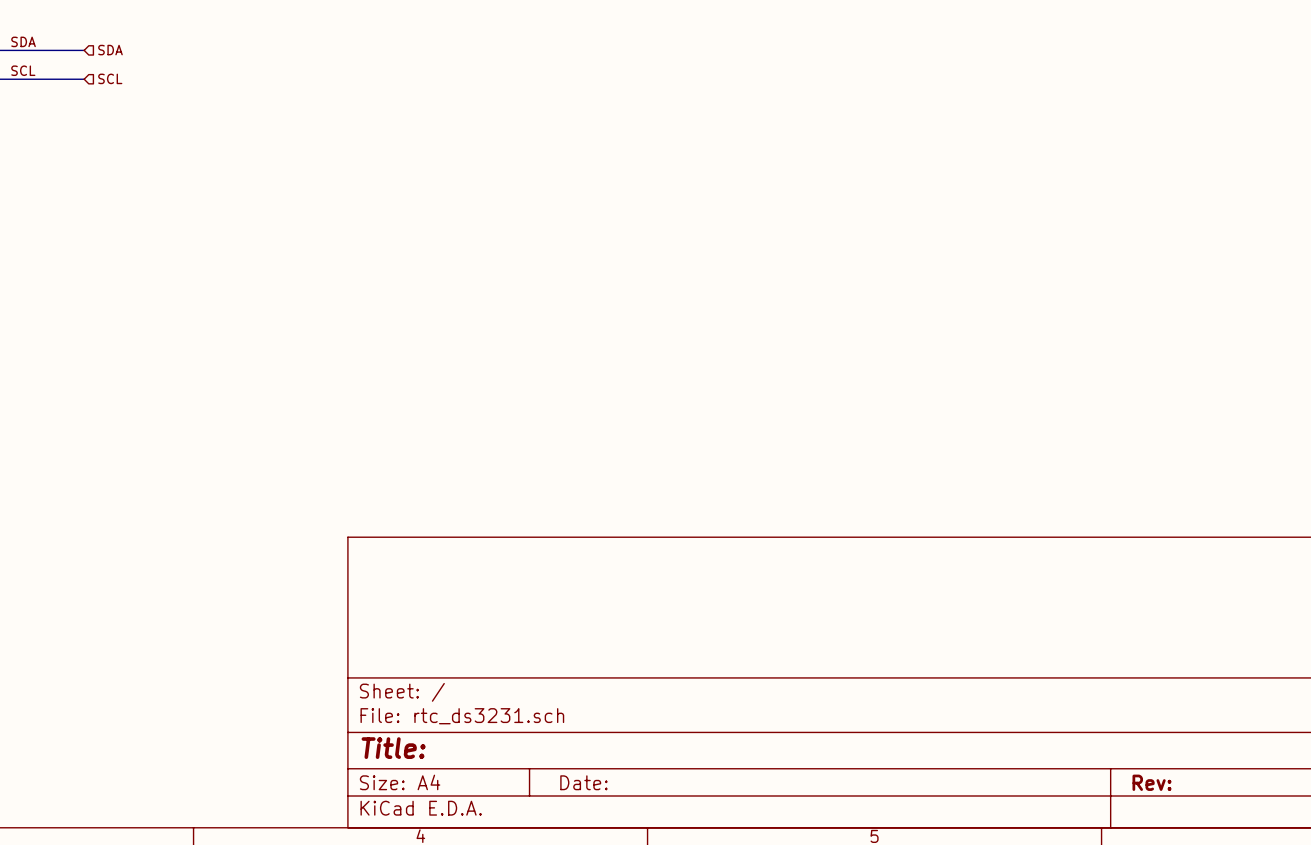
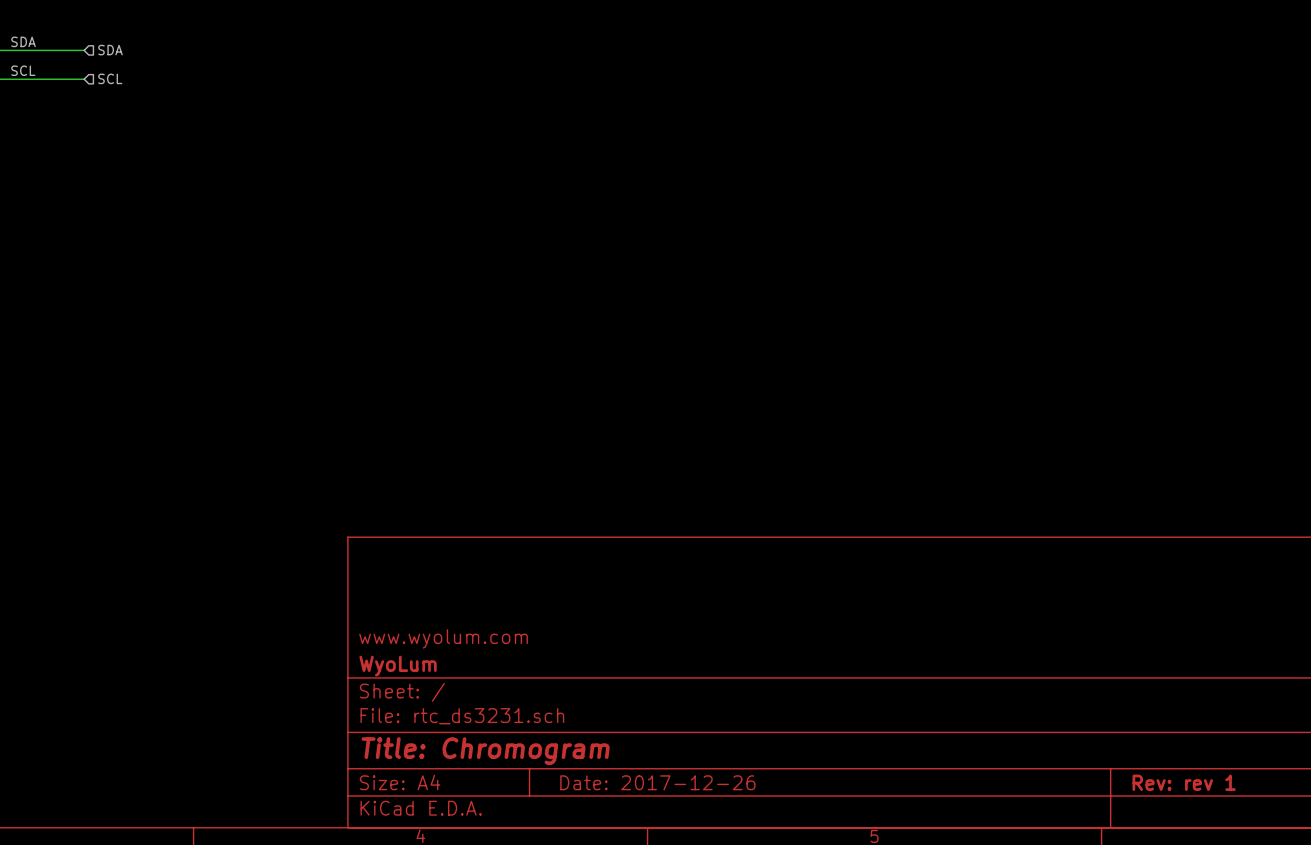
title block: none -> www.wyolum.com (443, 638)
title block: none -> WyoLum (398, 666)
title block: Title: (393, 748) -> Title: Chromogram (485, 751)
title block: Date: (583, 782) -> Date: 2017-12-26 (657, 782)
title block: Rev: (1152, 782) -> Rev: rev 1 (1184, 782)

